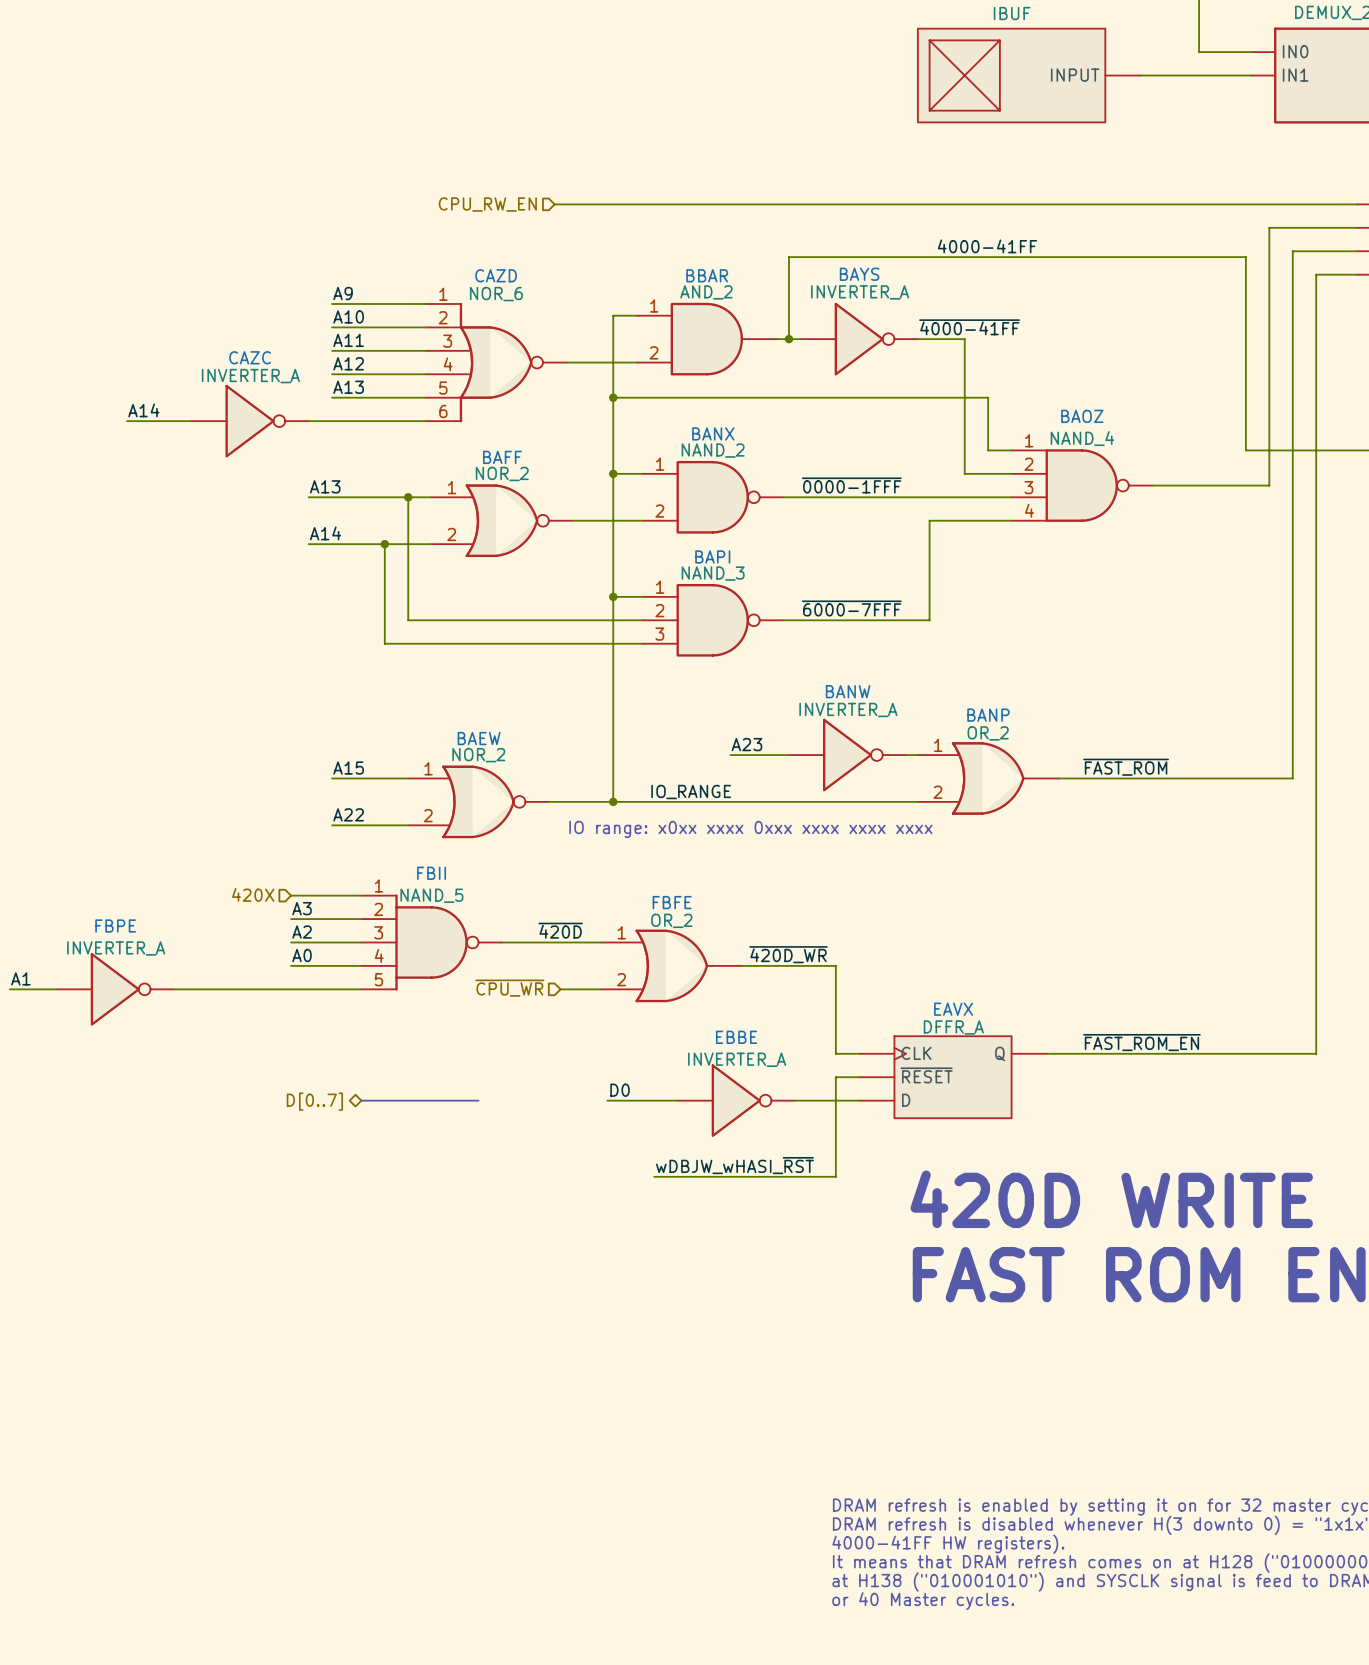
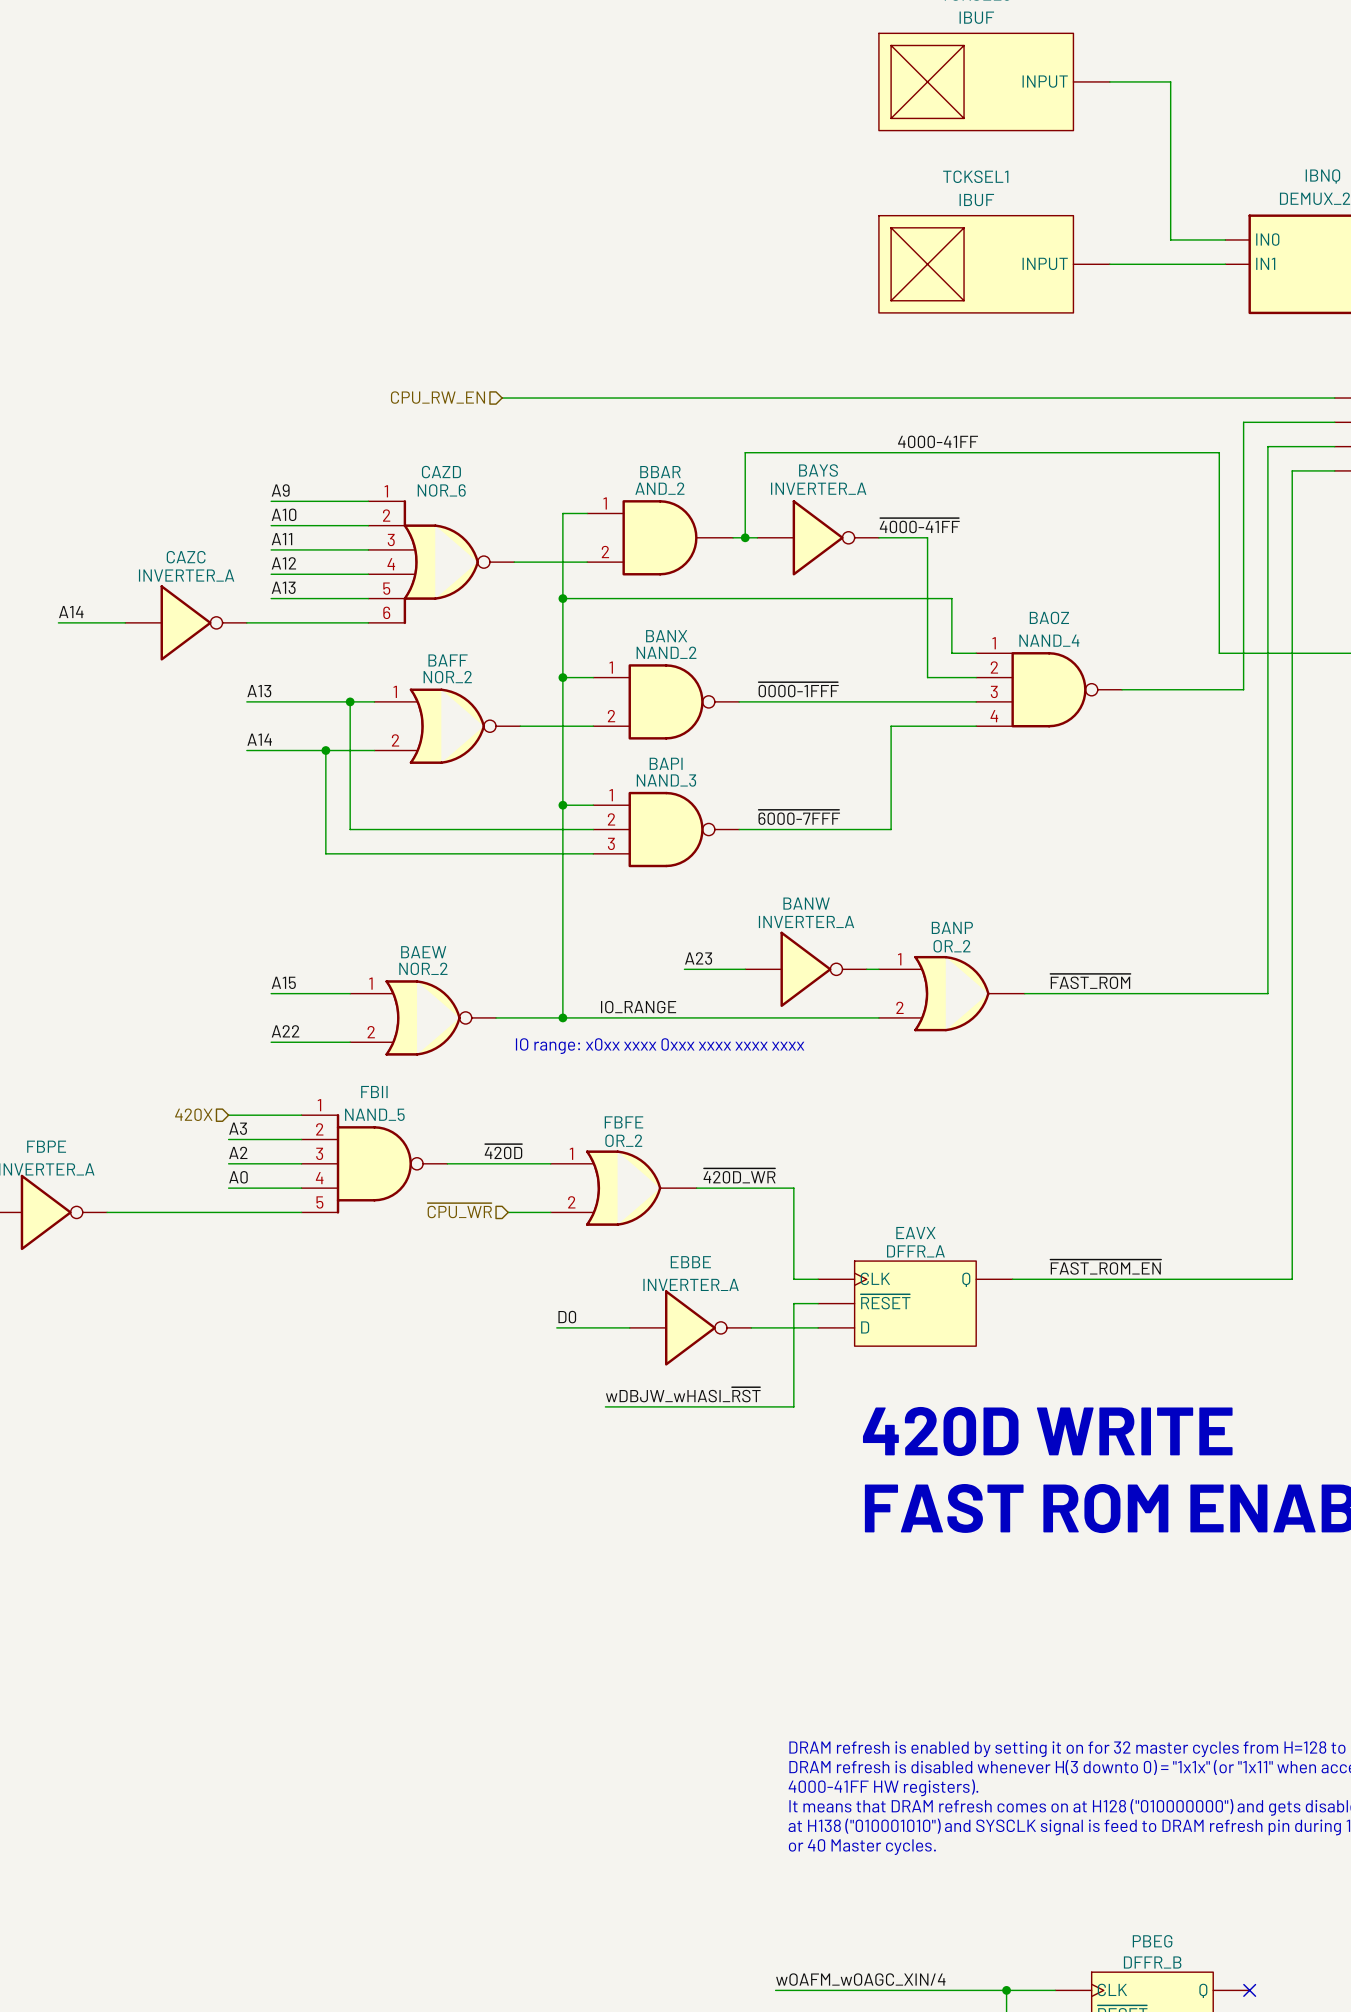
bus: (361, 1100) (478, 1100) -> none
hierarchical label: D[0..7] (314, 1101) -> none

